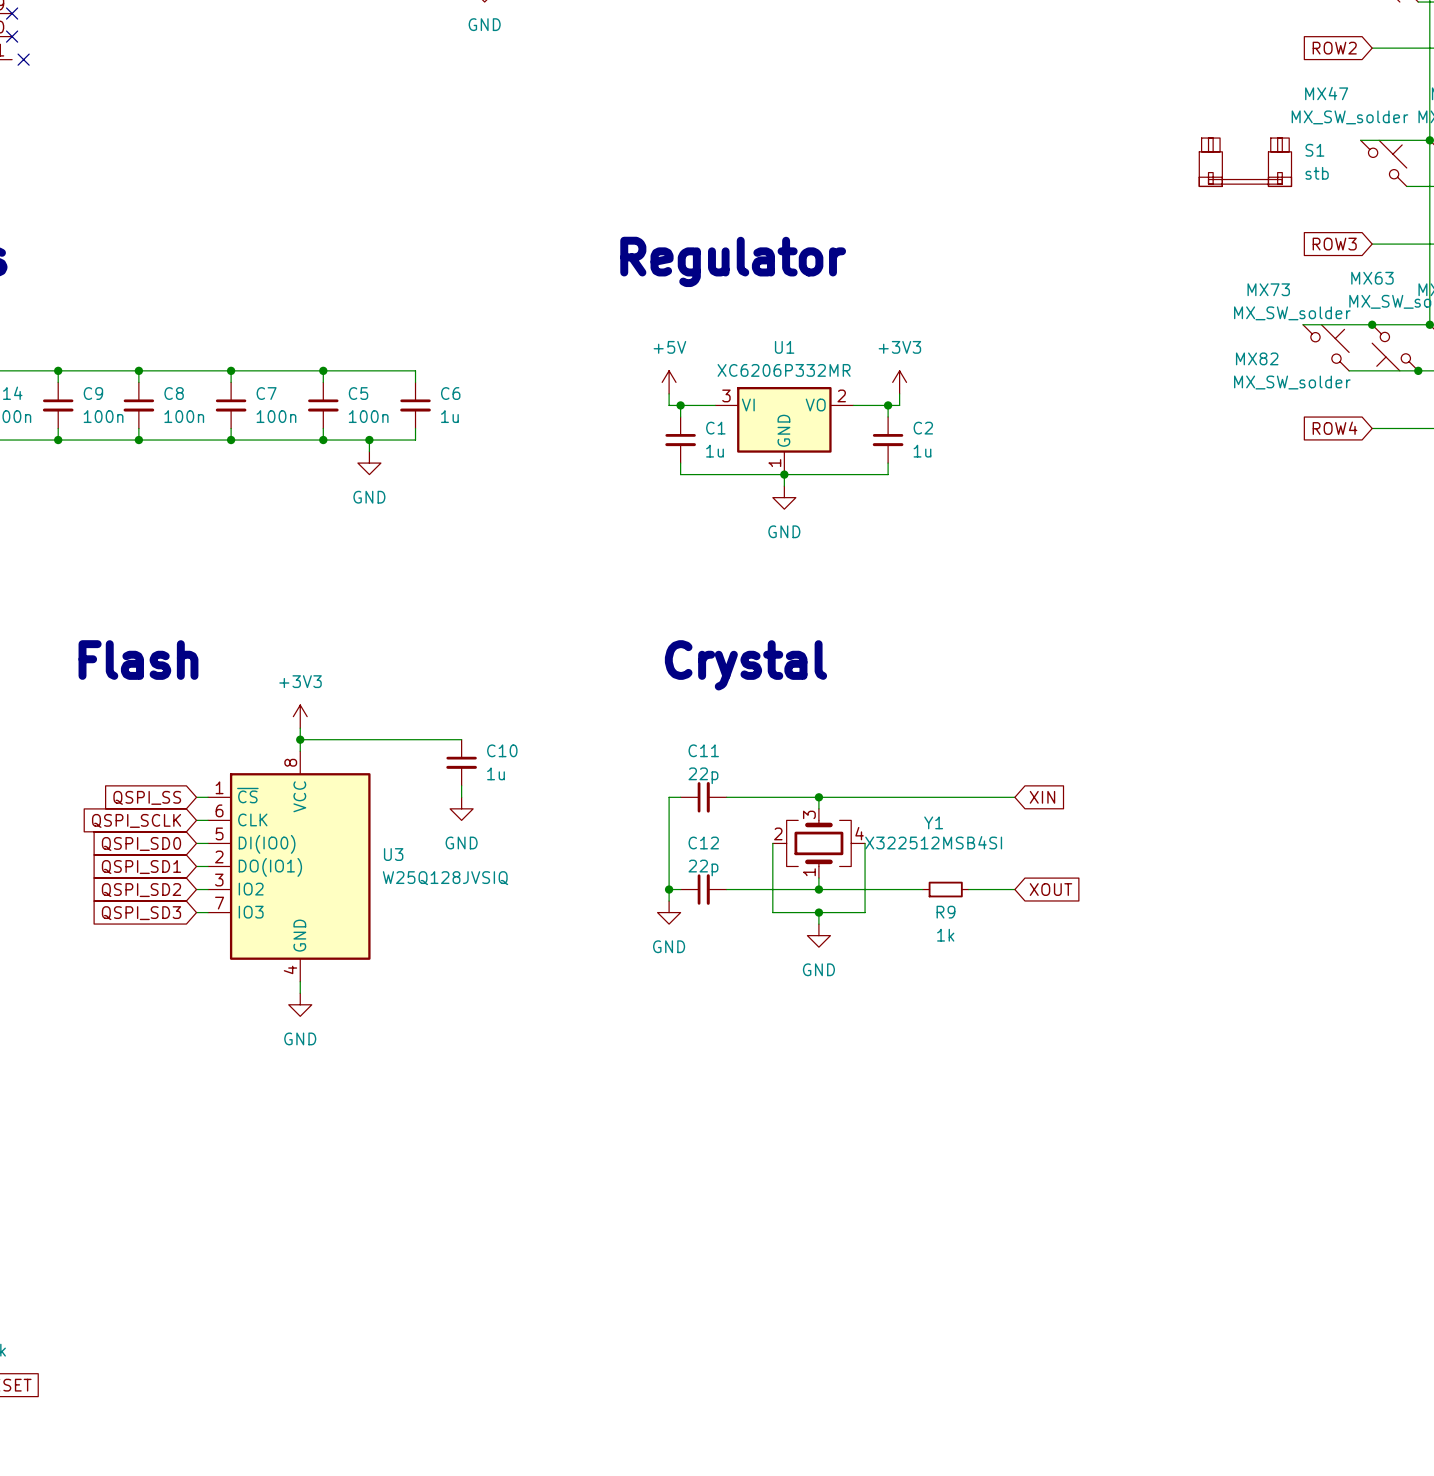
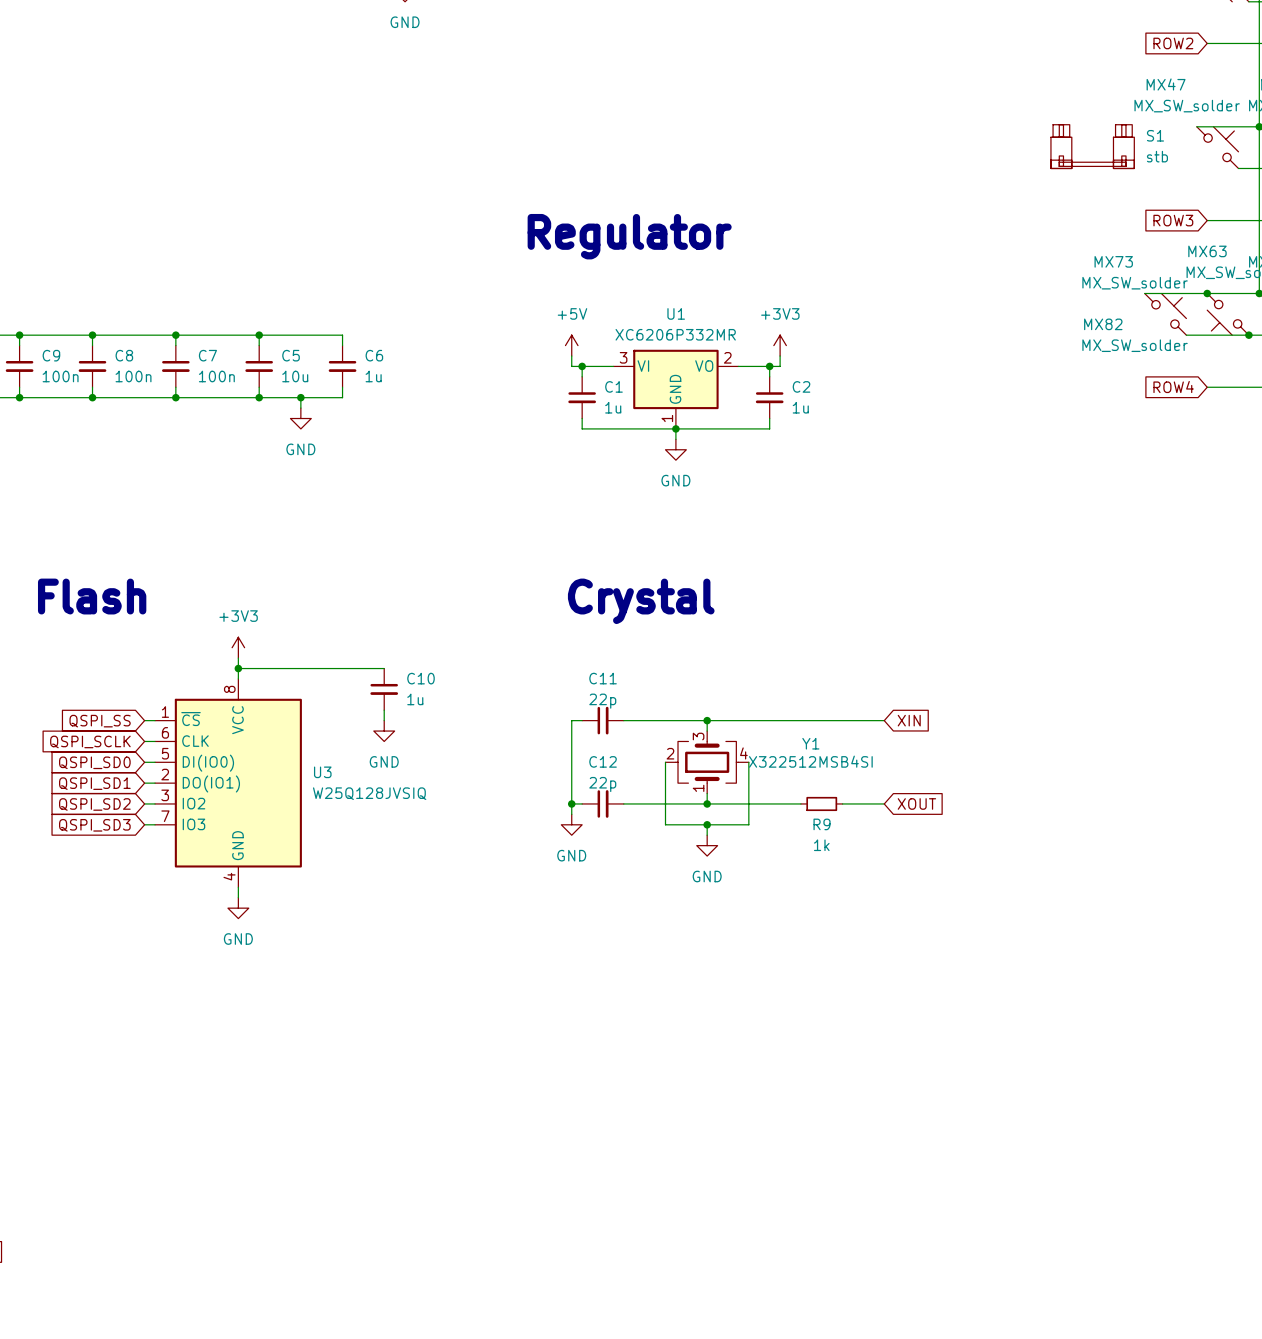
C5 value: 100n (368, 416) -> 10u (295, 376)

